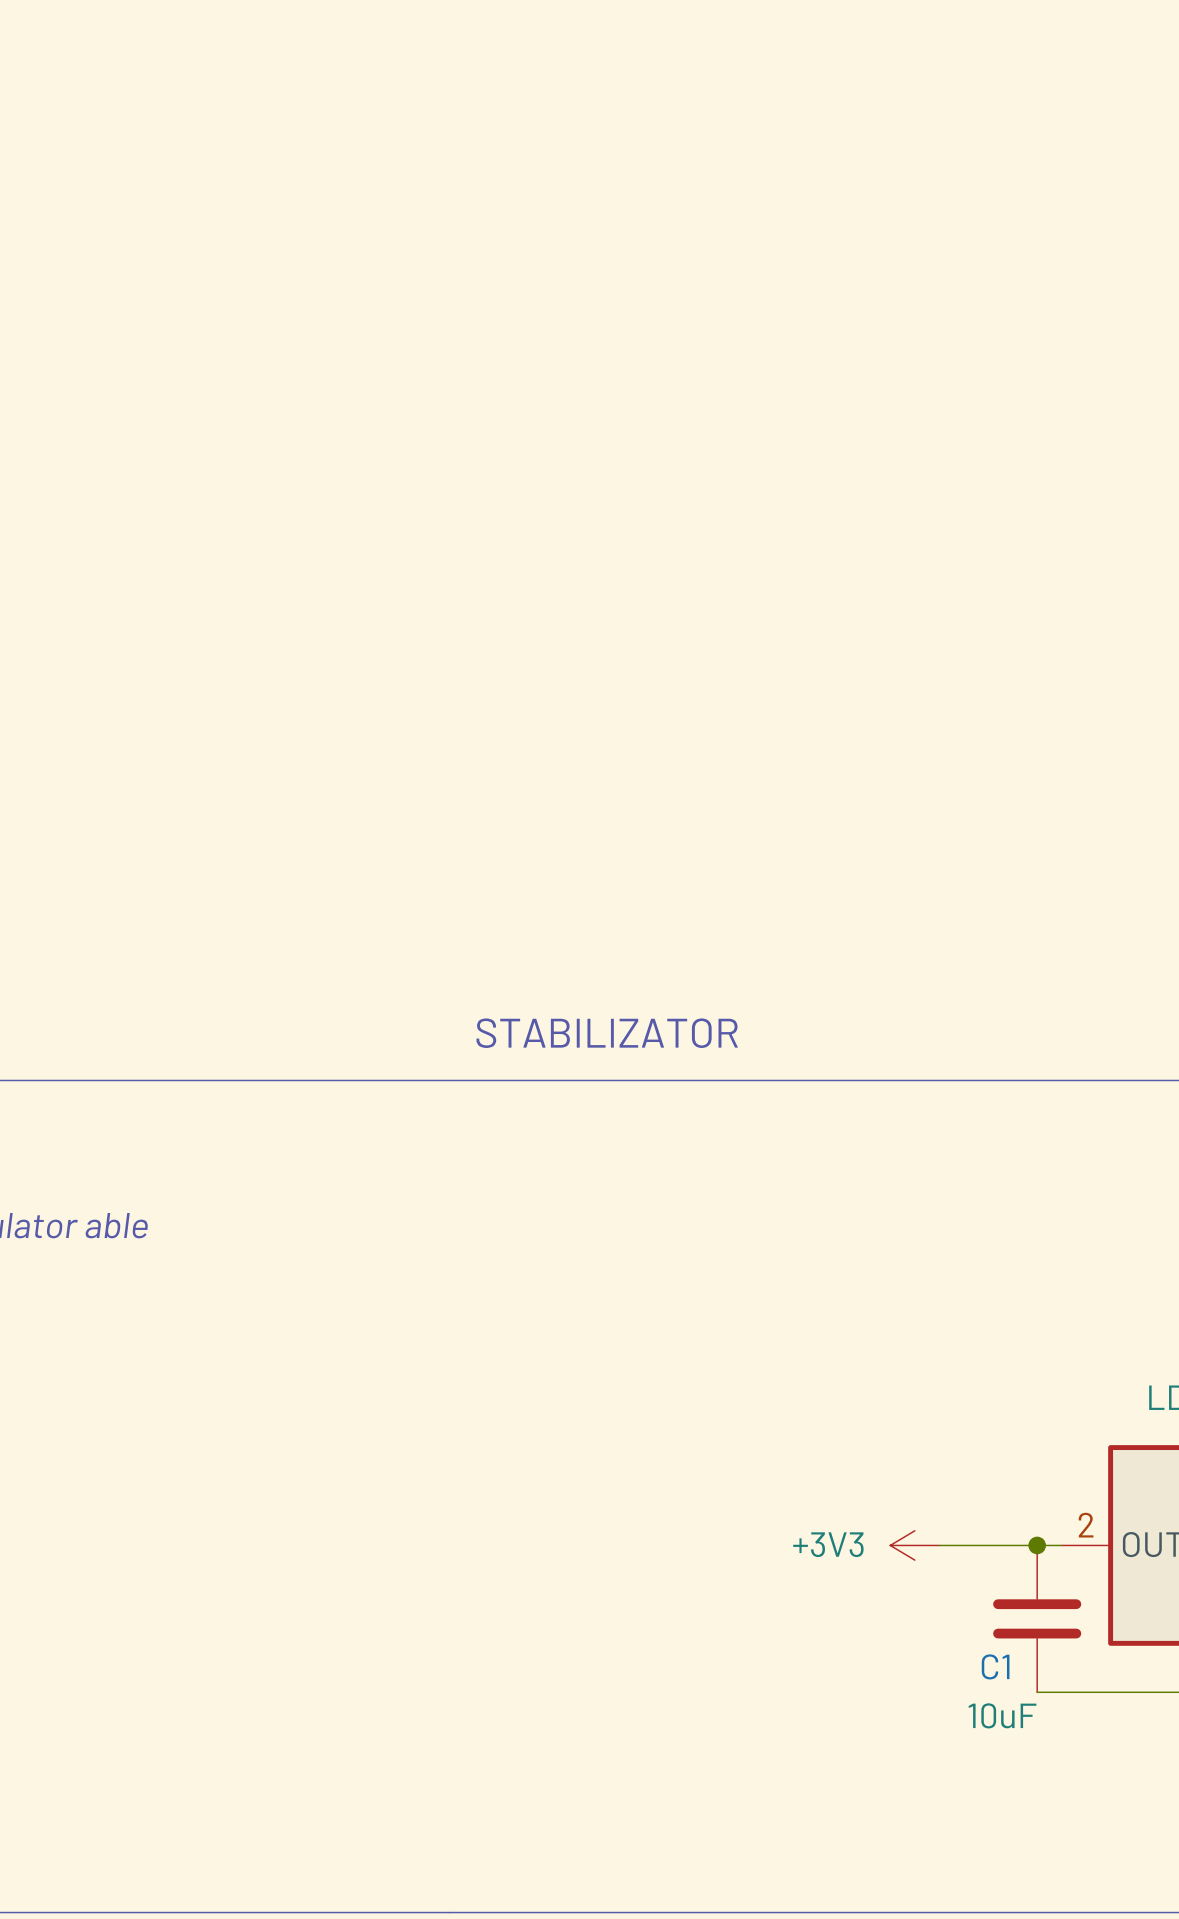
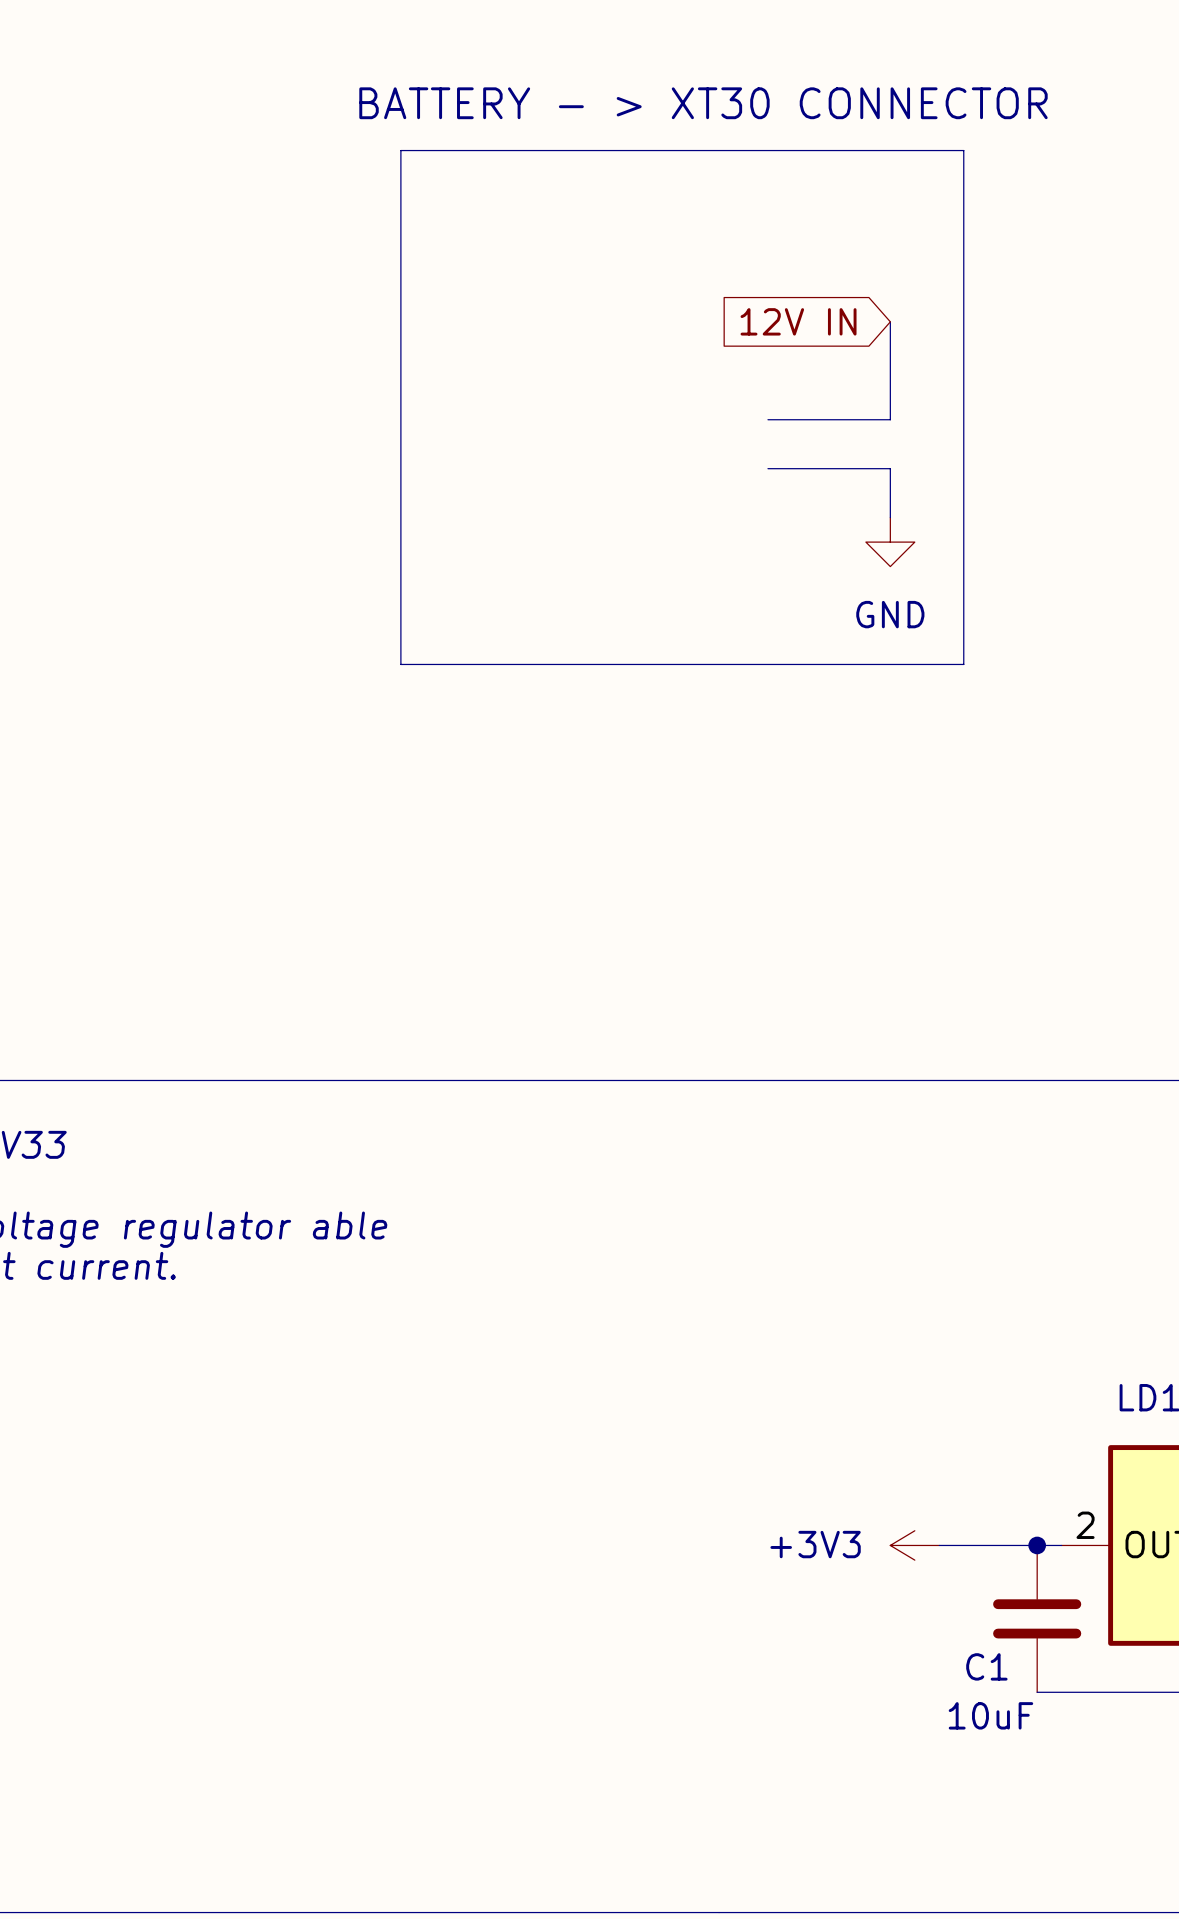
text: none -> BATTERY - > XT30 CONNECTOR (703, 103)
line: none -> (400, 150) (400, 664) (963, 664) (963, 150) (400, 150)
global label: none -> 12V IN (798, 321)
wire: none -> (890, 321) (890, 419) (767, 419)
wire: none -> (767, 468) (890, 468) (890, 517)
power symbol: none -> GND (890, 542)
text: STABILIZATOR (607, 1033) -> none

